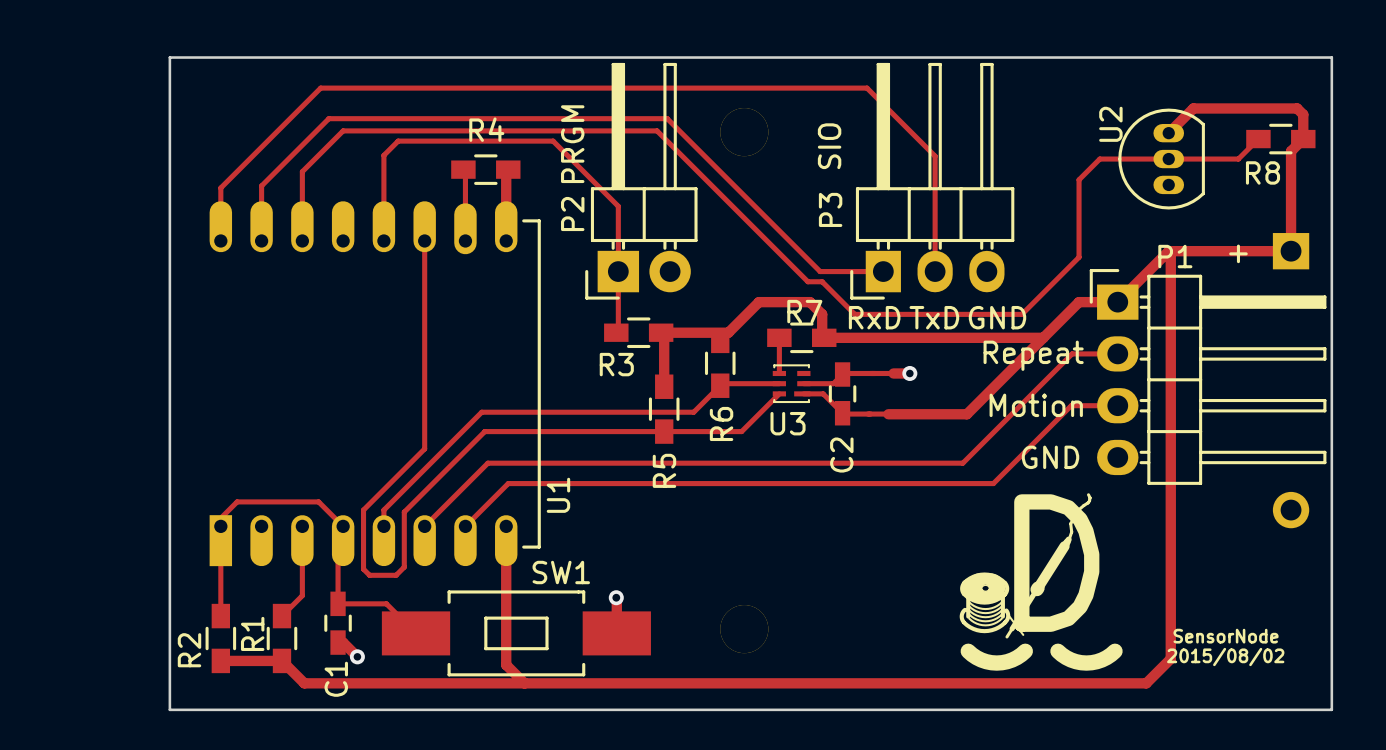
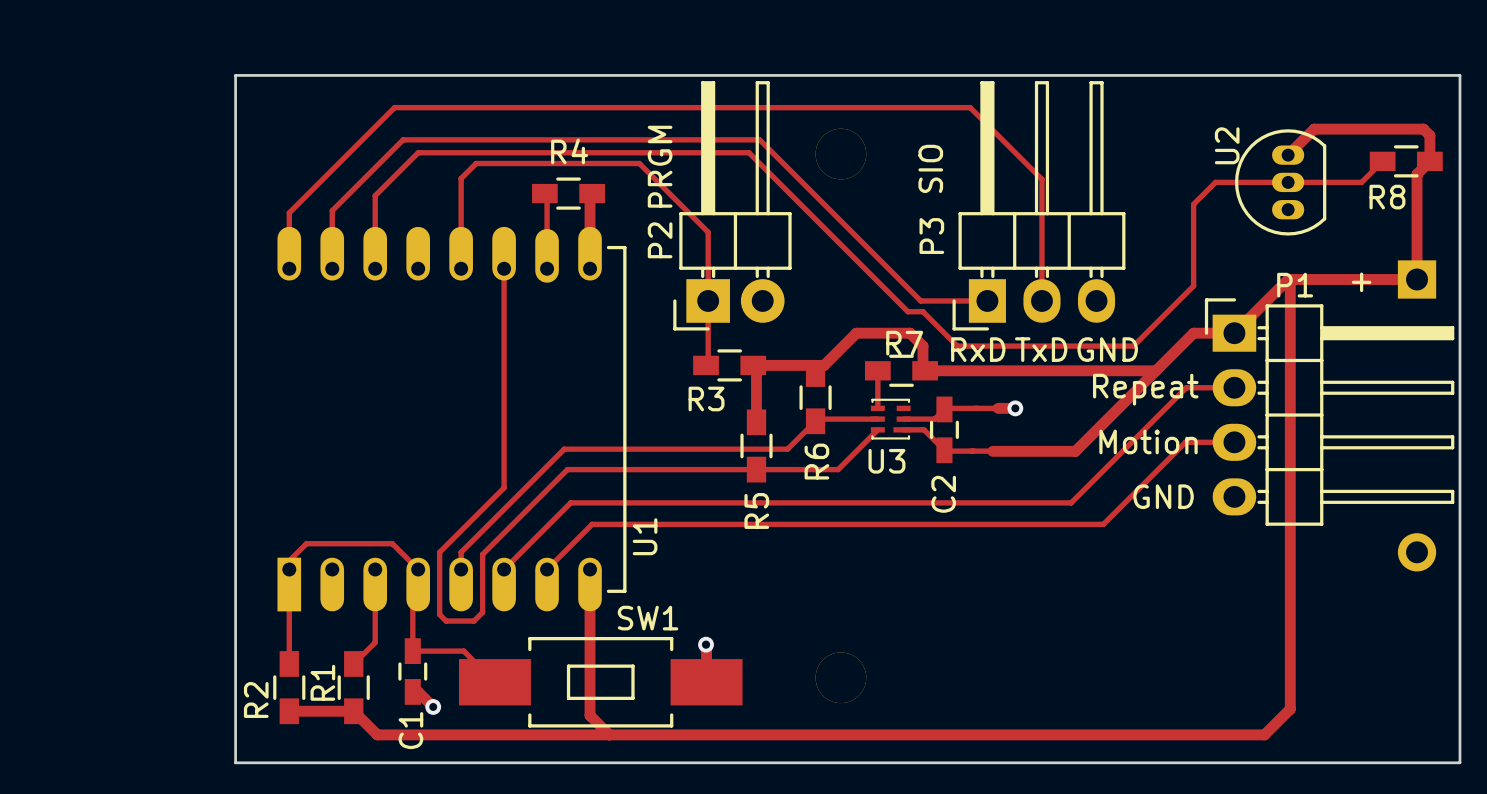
drawing: [959, 493, 1123, 671] -> none
text: SensorNode (1226, 636) -> none
text: 2015/08/02 (1225, 657) -> none

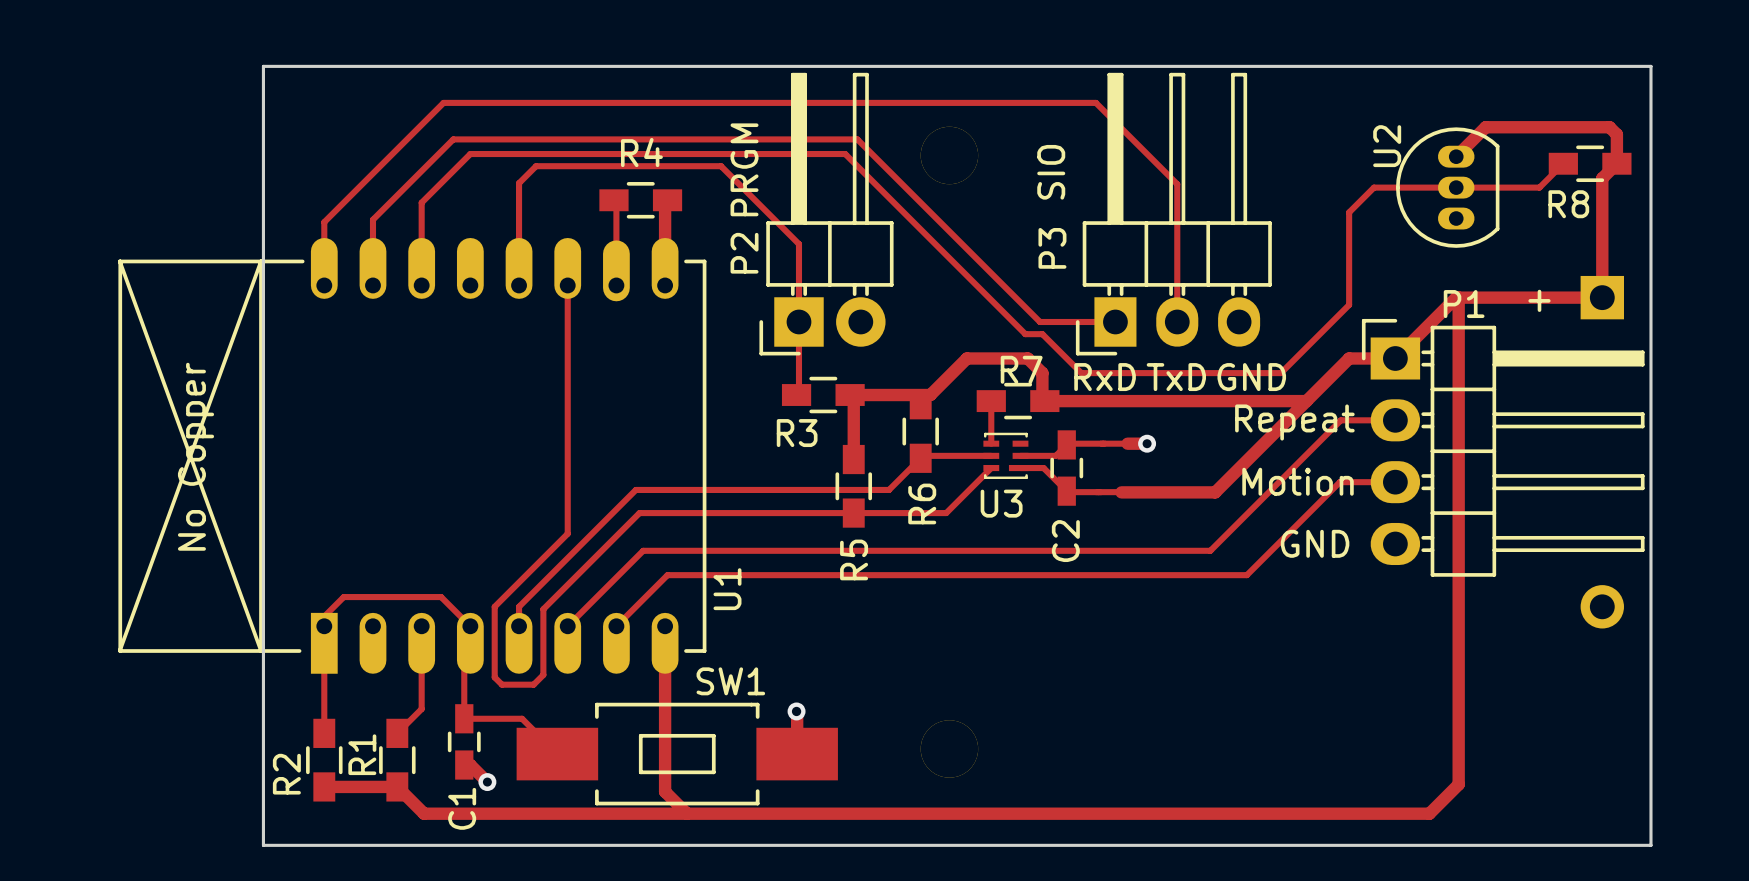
U1 footprint: [277, 226, 627, 612] -> [117, 238, 707, 674]

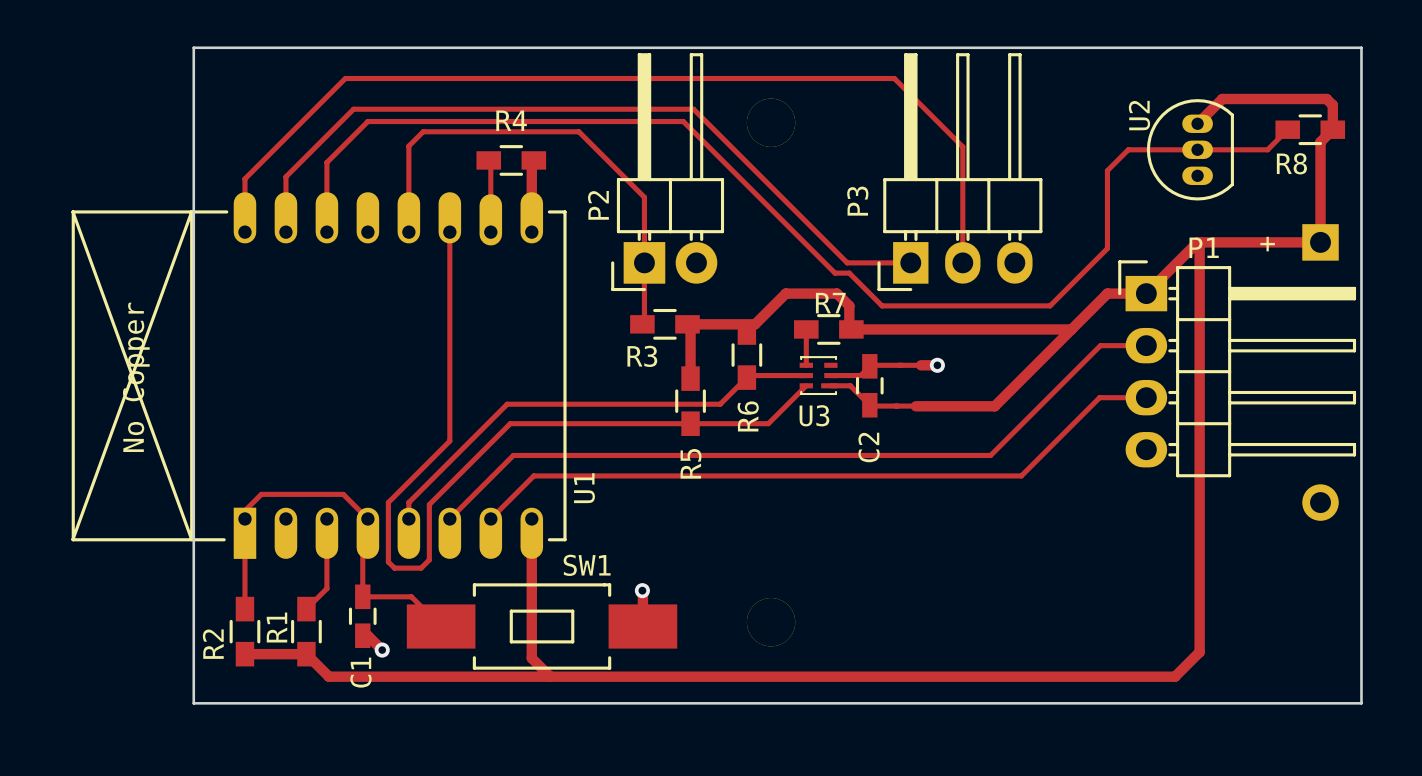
text: PRGM (744, 169) -> none
text: SIO (1051, 172) -> none
text: RxD (1105, 377) -> none
text: TxD (1176, 377) -> none
text: GND (1251, 377) -> none
text: Repeat (1294, 422) -> none
text: Motion (1298, 481) -> none
text: GND (1315, 543) -> none

